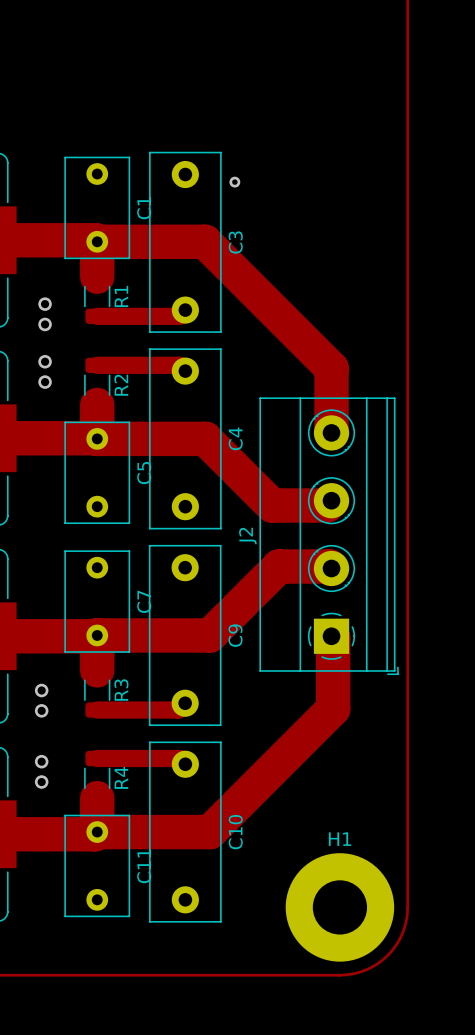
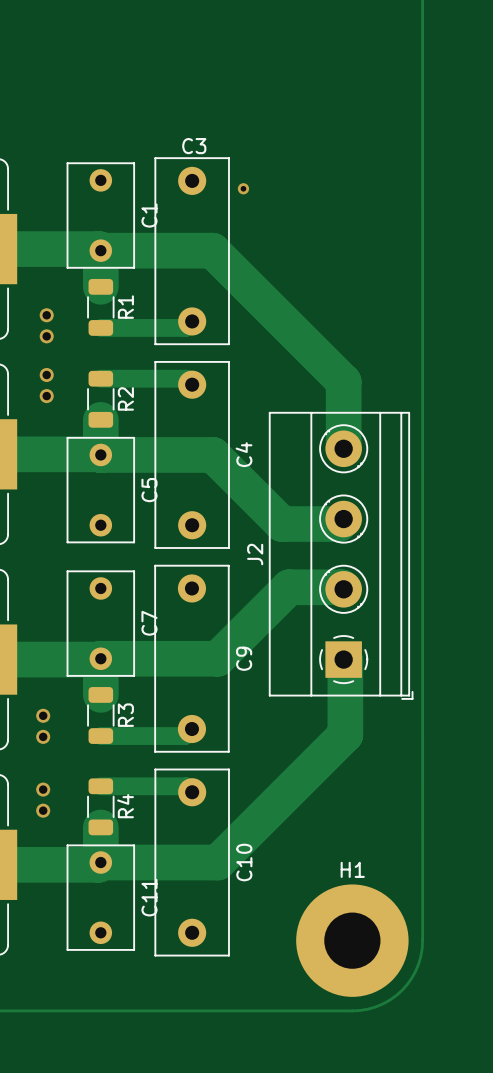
C3 name rotation: 0° (235, 242) -> 90° clockwise (194, 146)
C3 name position: C3 (235, 242) -> C3 (194, 146)

